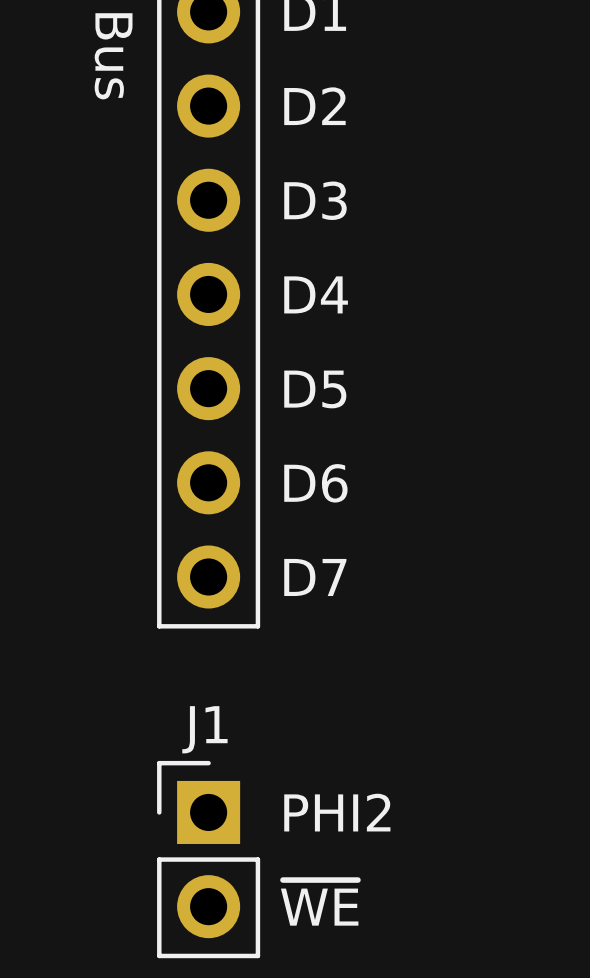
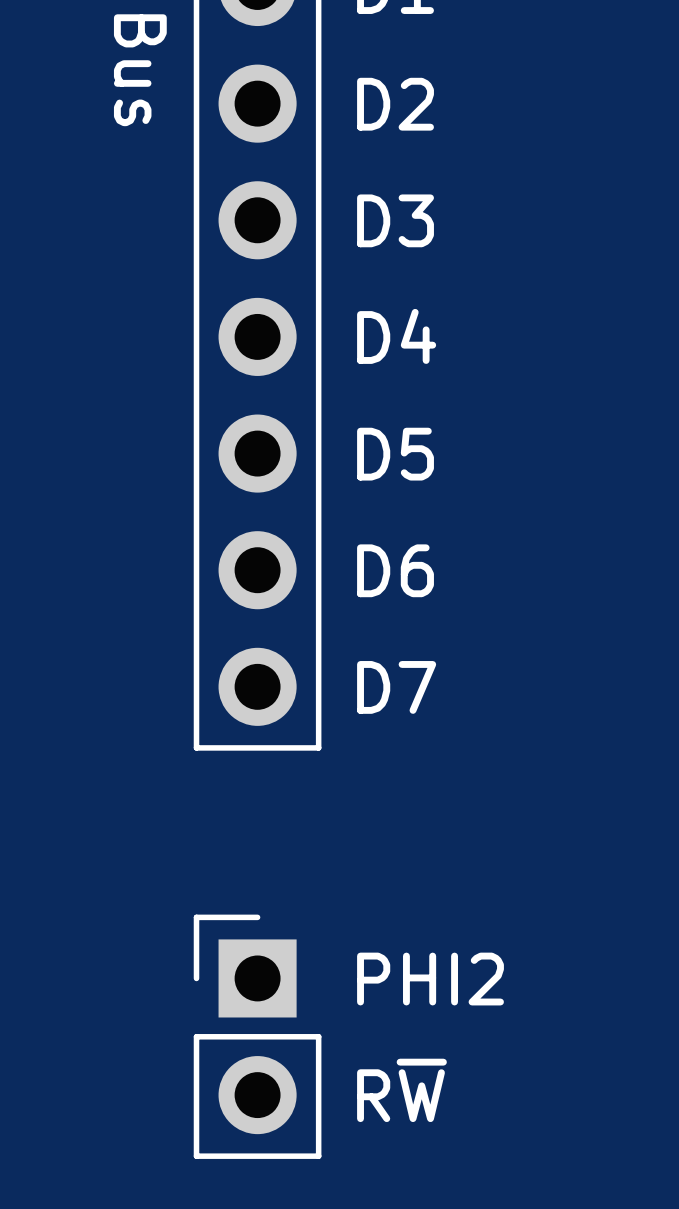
J1 name: J1 (204, 729) -> none
text: ~{WE} (319, 902) -> R~{W} (401, 1090)

